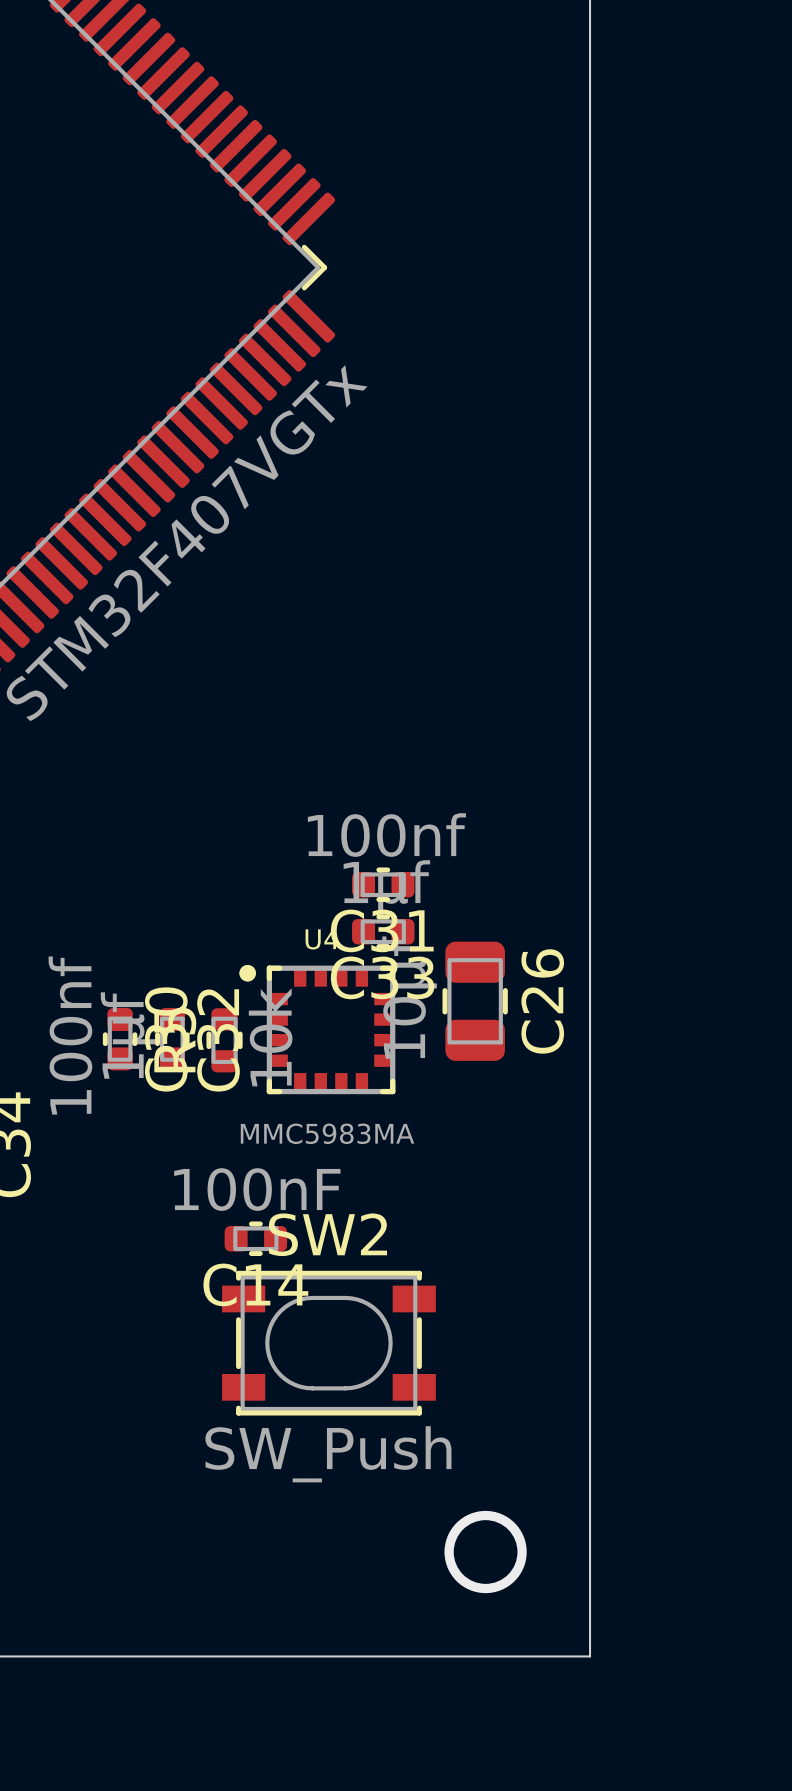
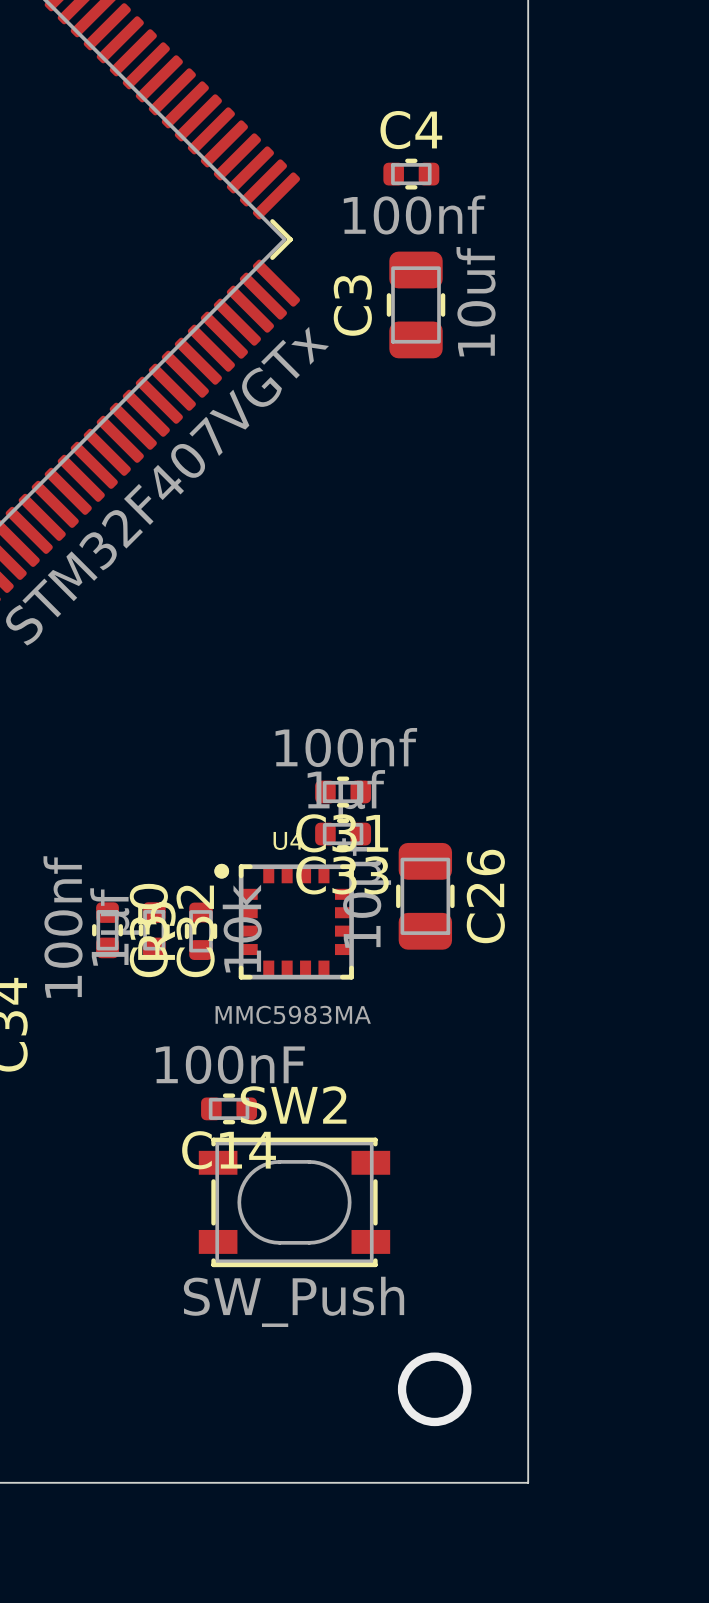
C4: none -> 100nf (411, 174)
C3: none -> 10uf (416, 304)

